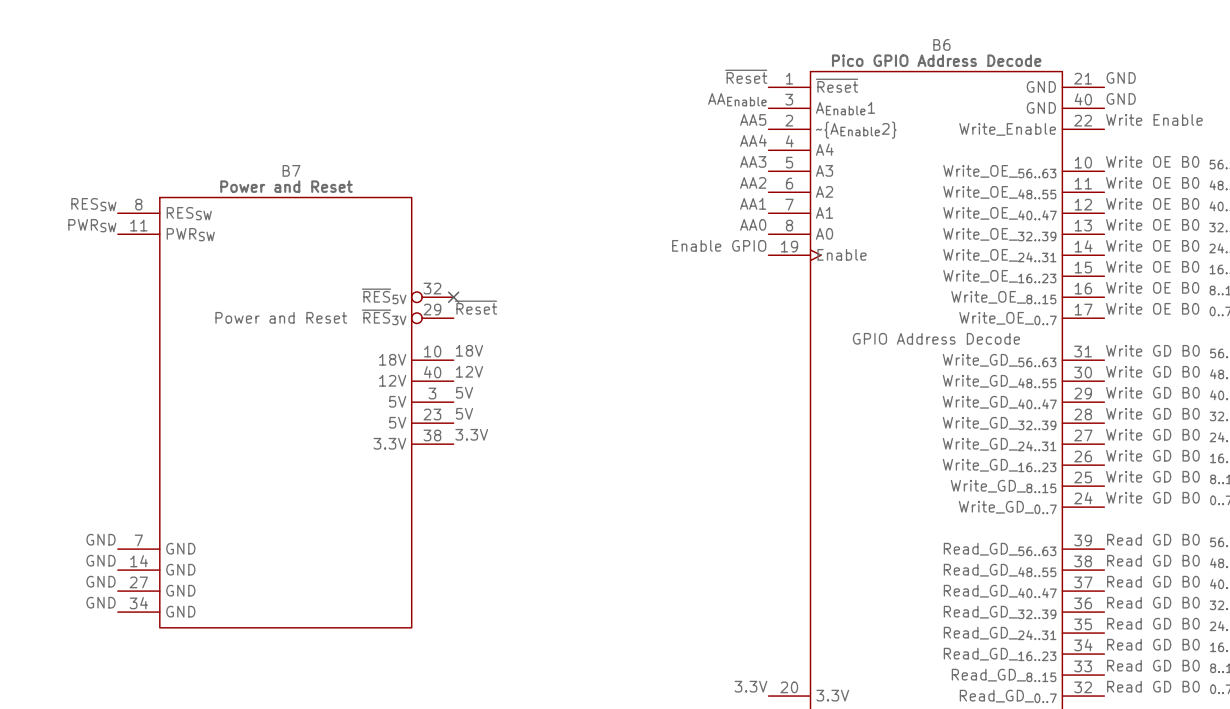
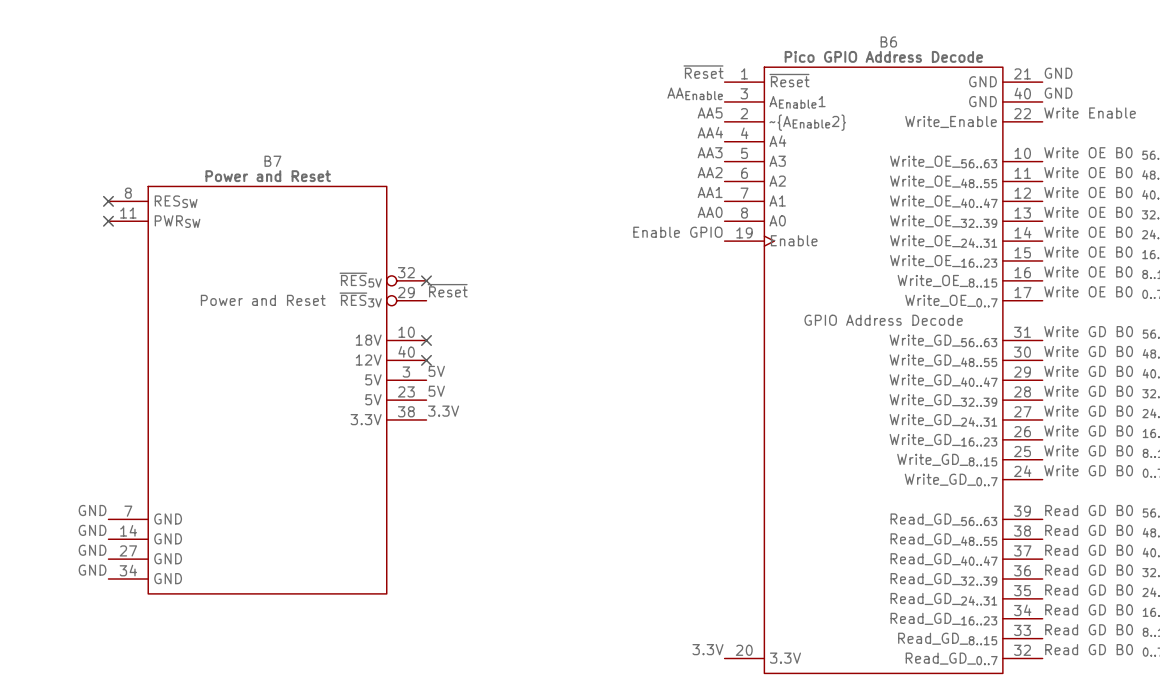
label: RESSW (93, 204) -> none
no-connect mark: none -> (108, 201)
label: PWRSW (92, 225) -> none
no-connect mark: none -> (108, 221)
label: 18V (469, 350) -> none
no-connect mark: none -> (426, 340)
label: 12V (469, 371) -> none
no-connect mark: none -> (426, 360)

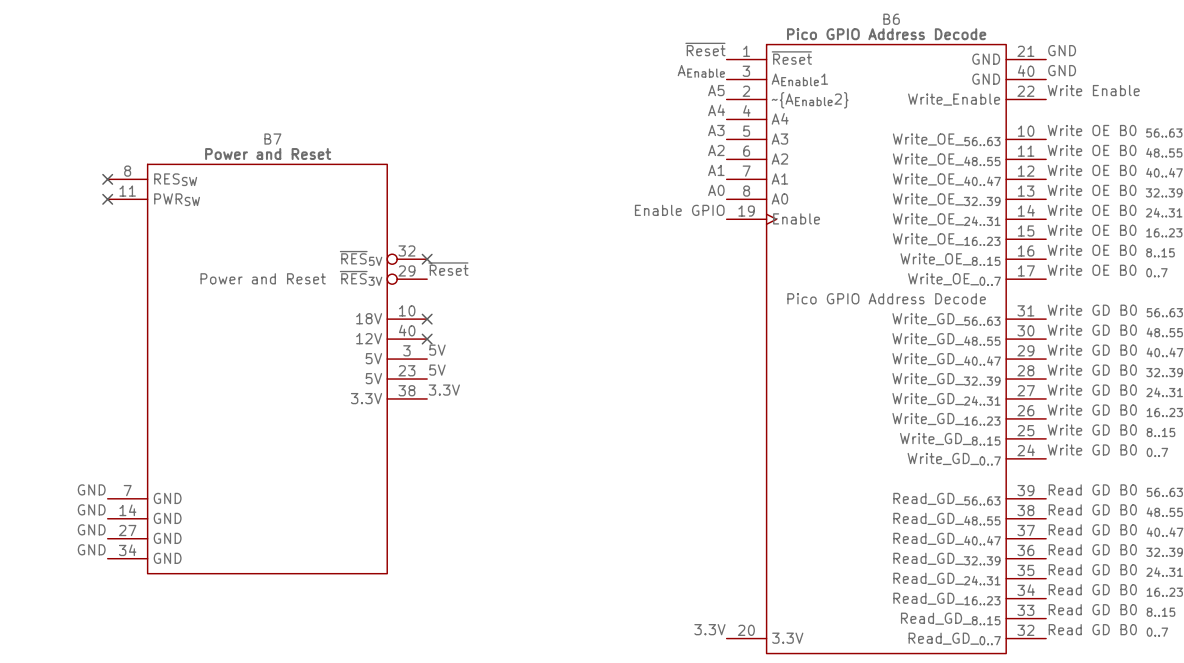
label: AAEnable (695, 93) -> AEnable (701, 71)
label: AA5 (710, 112) -> A5 (716, 90)
label: AA4 (710, 132) -> A4 (716, 110)
label: AA3 (710, 152) -> A3 (716, 130)
label: AA2 (710, 172) -> A2 (716, 150)
label: AA1 (710, 192) -> A1 (716, 170)
label: AA0 (710, 212) -> A0 (716, 190)
B6 text: GPIO Address Decode (883, 320) -> Pico GPIO Address Decode (886, 298)

